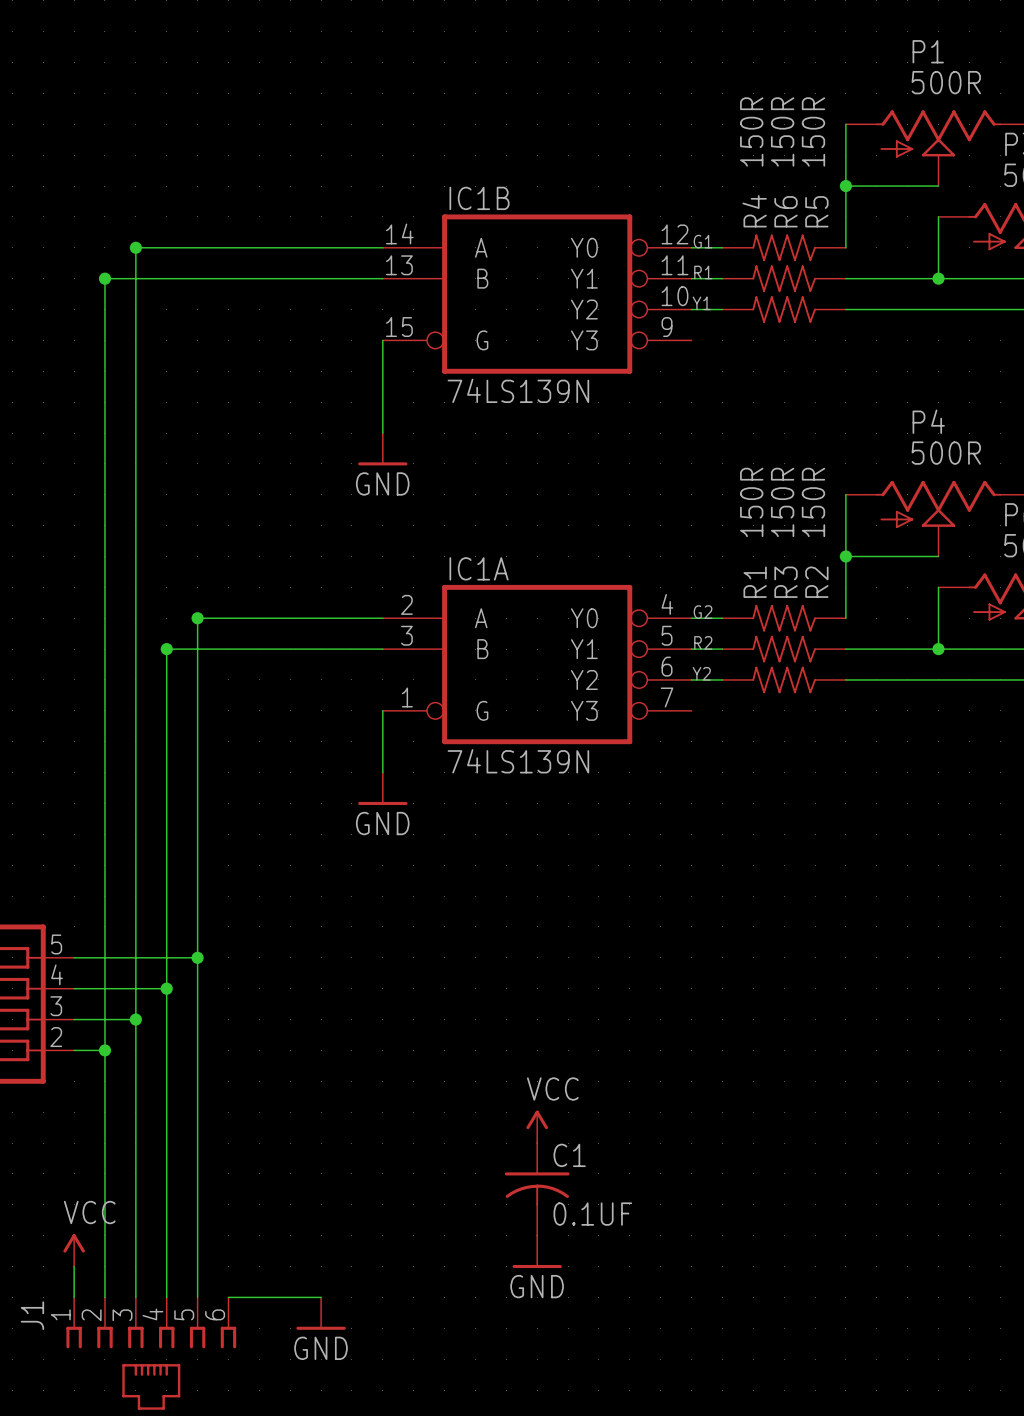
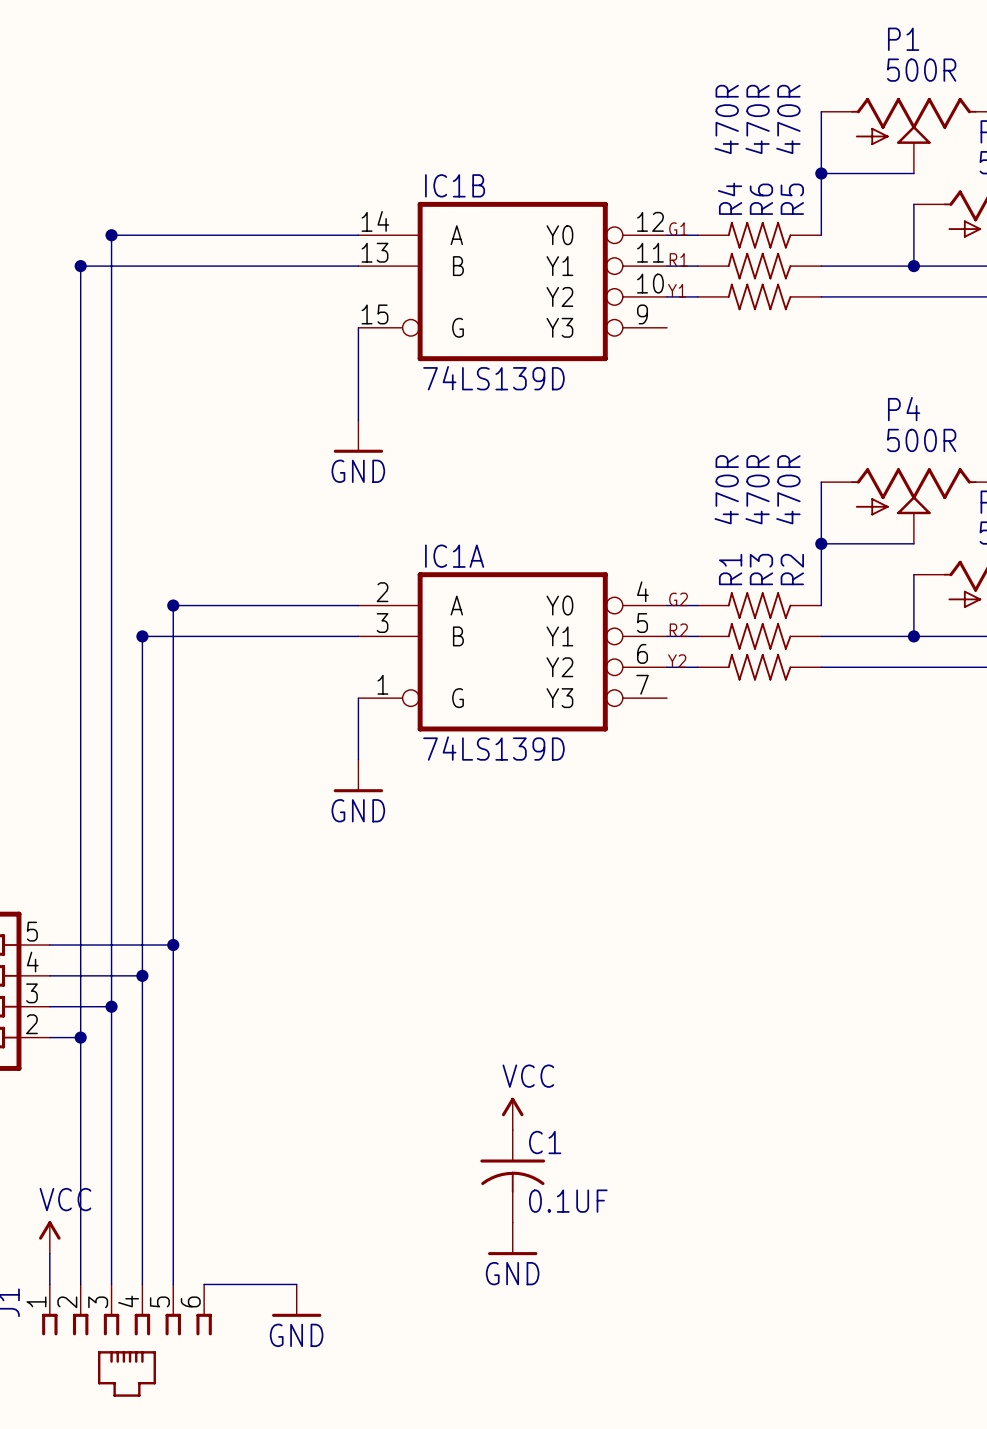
R4 value: 150R (751, 131) -> 470R (726, 119)
R6 value: 150R (782, 131) -> 470R (757, 119)
R5 value: 150R (813, 131) -> 470R (788, 119)
IC1B value: 74LS139N (518, 390) -> 74LS139D (493, 378)
R1 value: 150R (751, 502) -> 470R (726, 489)
R3 value: 150R (782, 502) -> 470R (757, 489)
R2 value: 150R (813, 502) -> 470R (788, 489)
IC1A value: 74LS139N (518, 761) -> 74LS139D (493, 748)

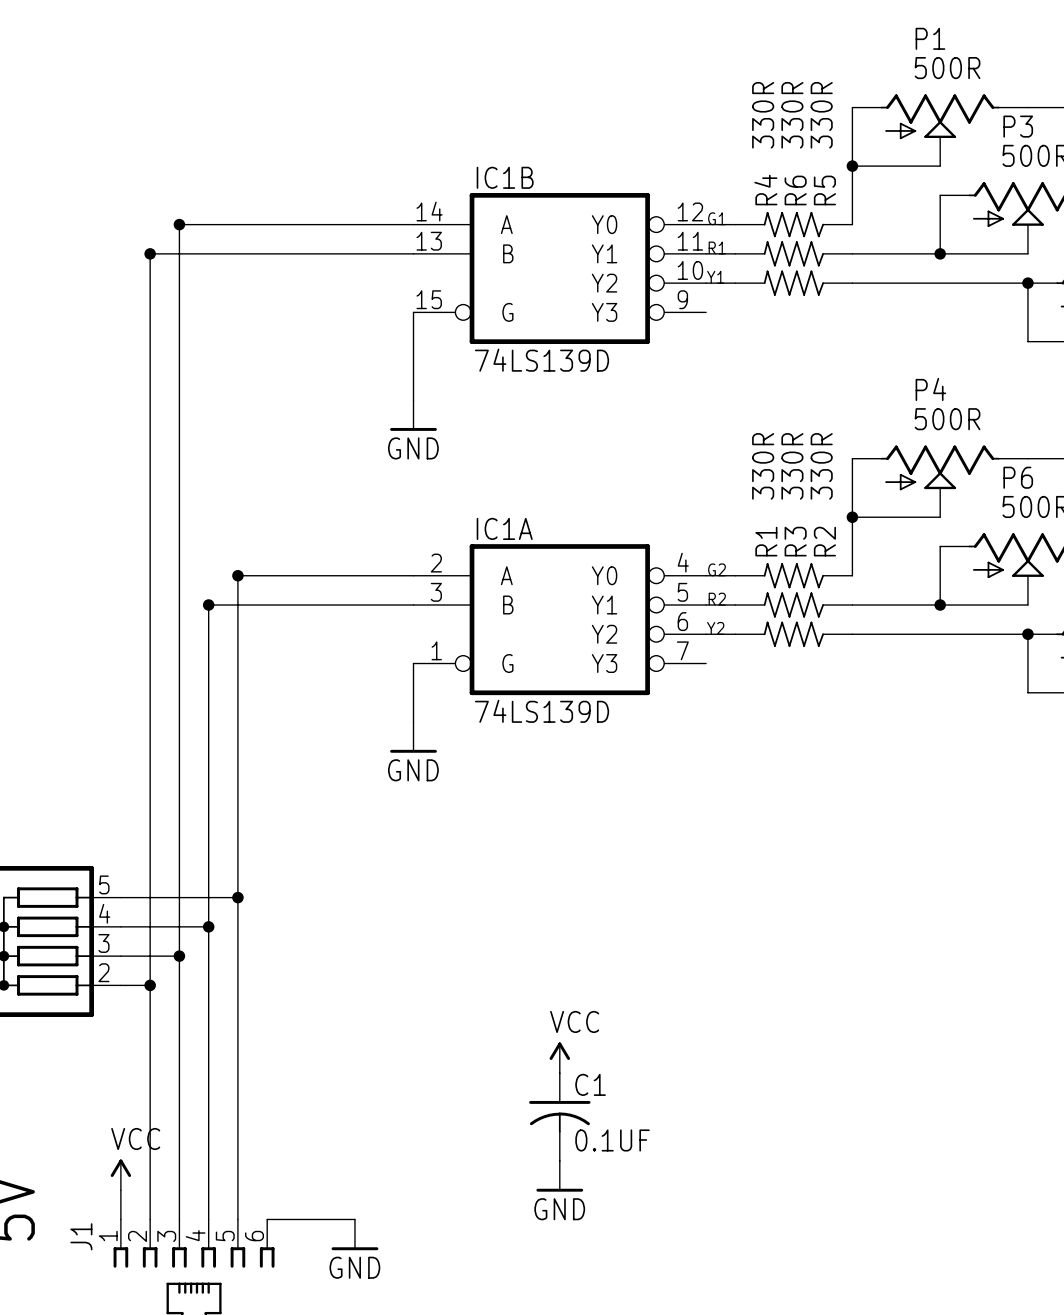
R4 value: 470R (726, 119) -> 330R (763, 115)
R6 value: 470R (757, 119) -> 330R (792, 115)
R5 value: 470R (788, 119) -> 330R (821, 115)
R1 value: 470R (726, 489) -> 330R (763, 466)
R3 value: 470R (757, 489) -> 330R (792, 466)
R2 value: 470R (788, 489) -> 330R (821, 466)

